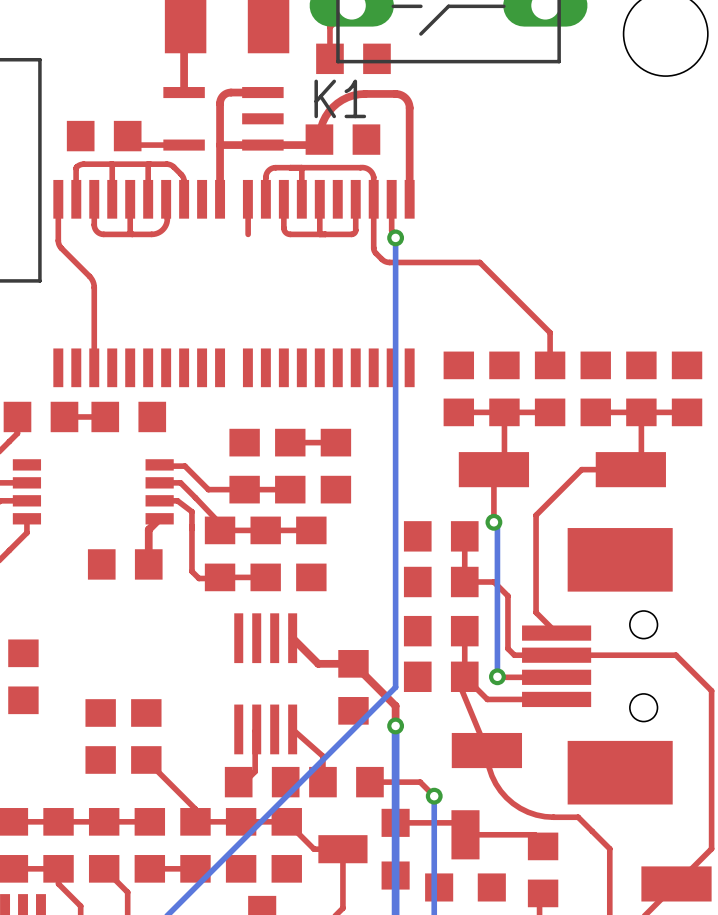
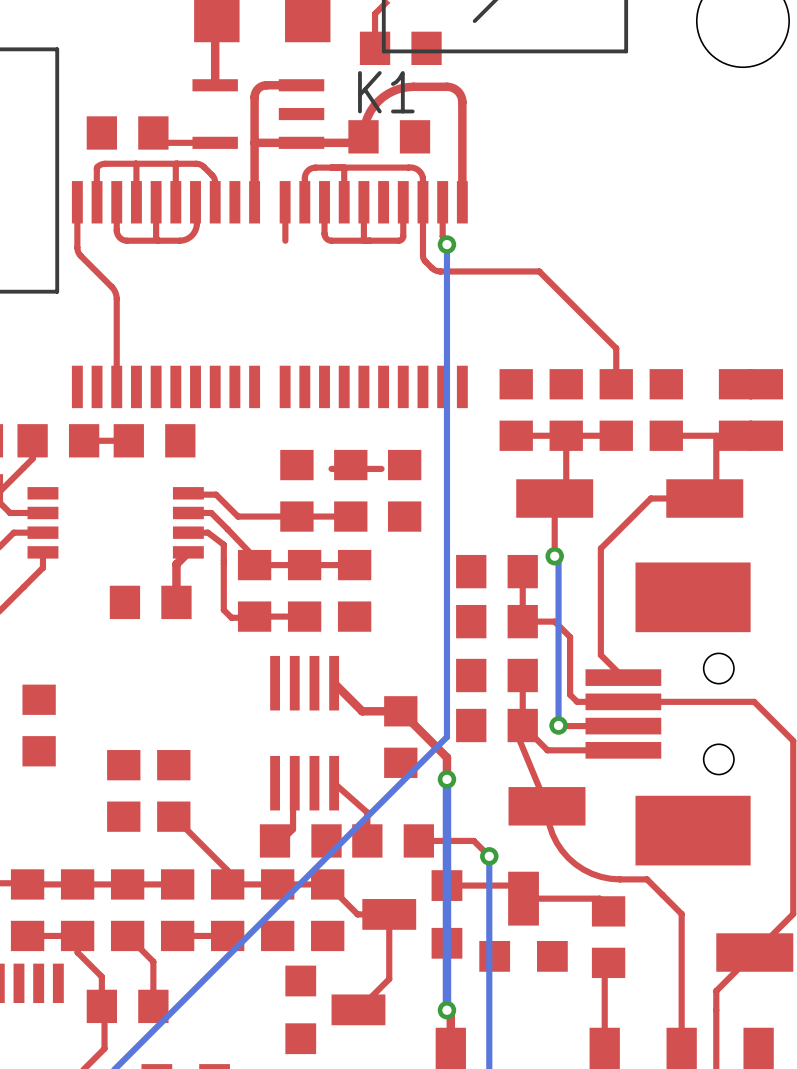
part position: (641, 388) -> (735, 410)
part: none -> (350, 490)
part: none -> (404, 490)
part position: (244, 466) -> (296, 490)
part: (290, 466) -> none
part: (335, 466) -> none
top track: (204, 486) (208, 489) (290, 489) -> (238, 516) (350, 516)

